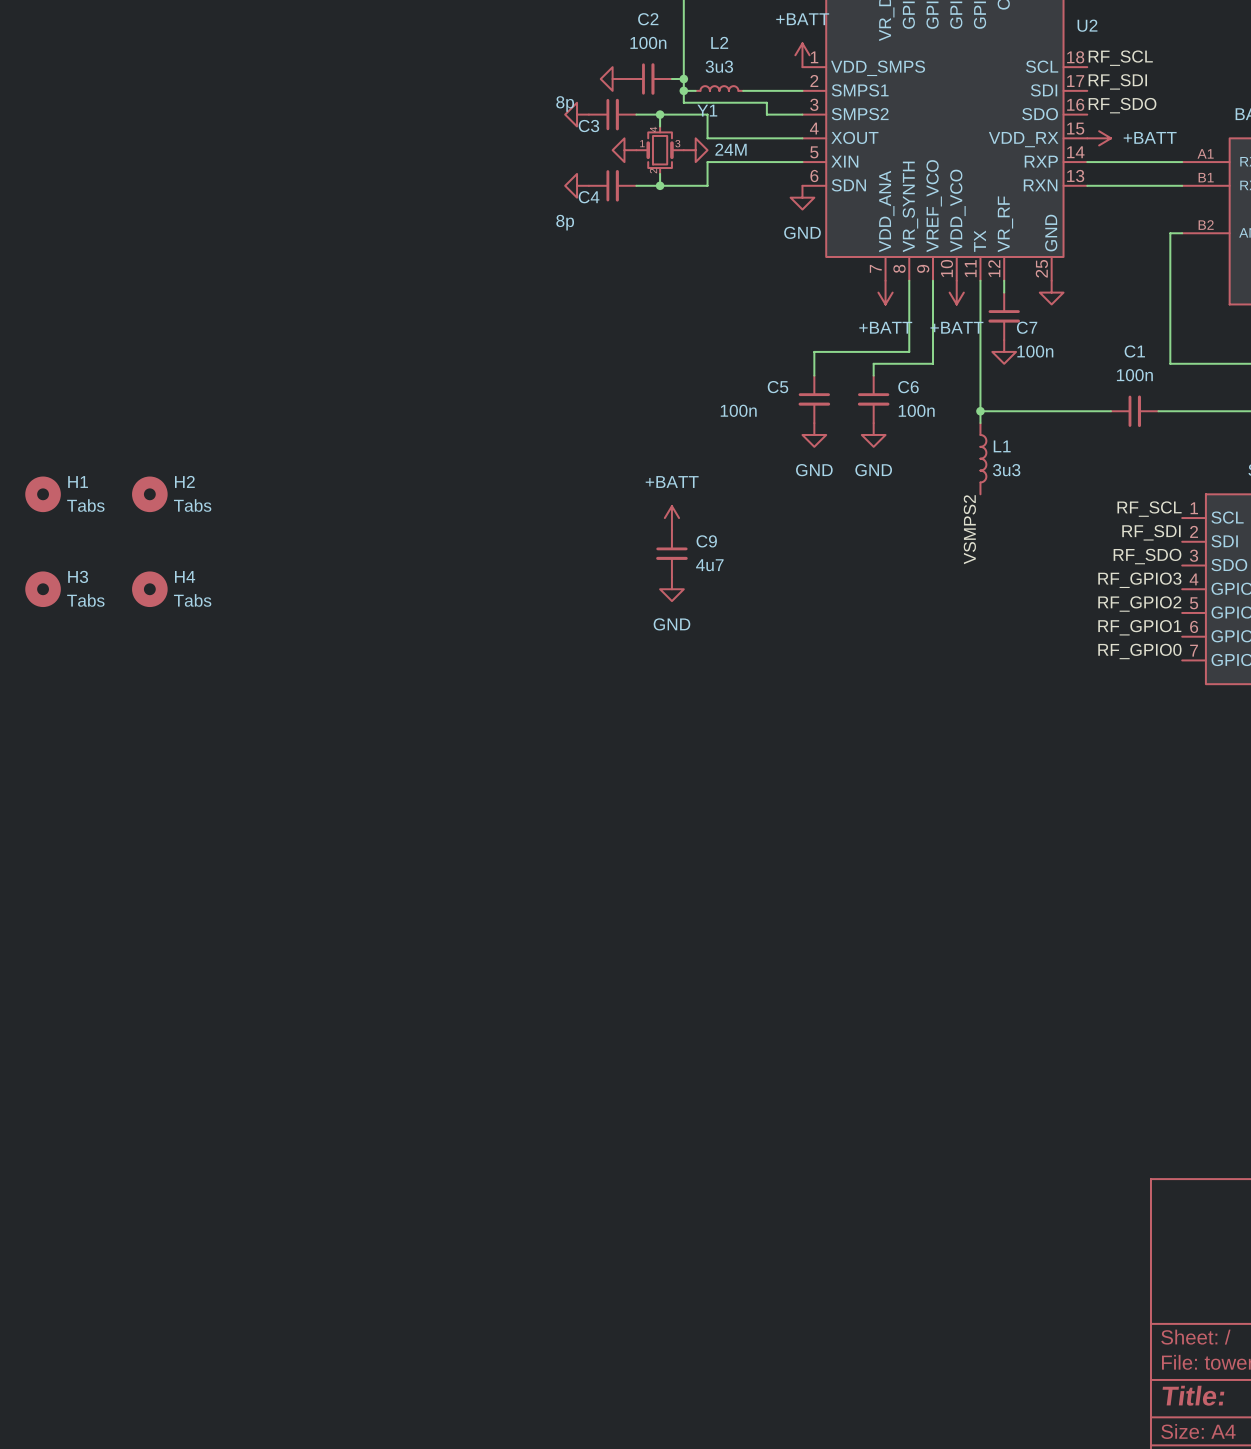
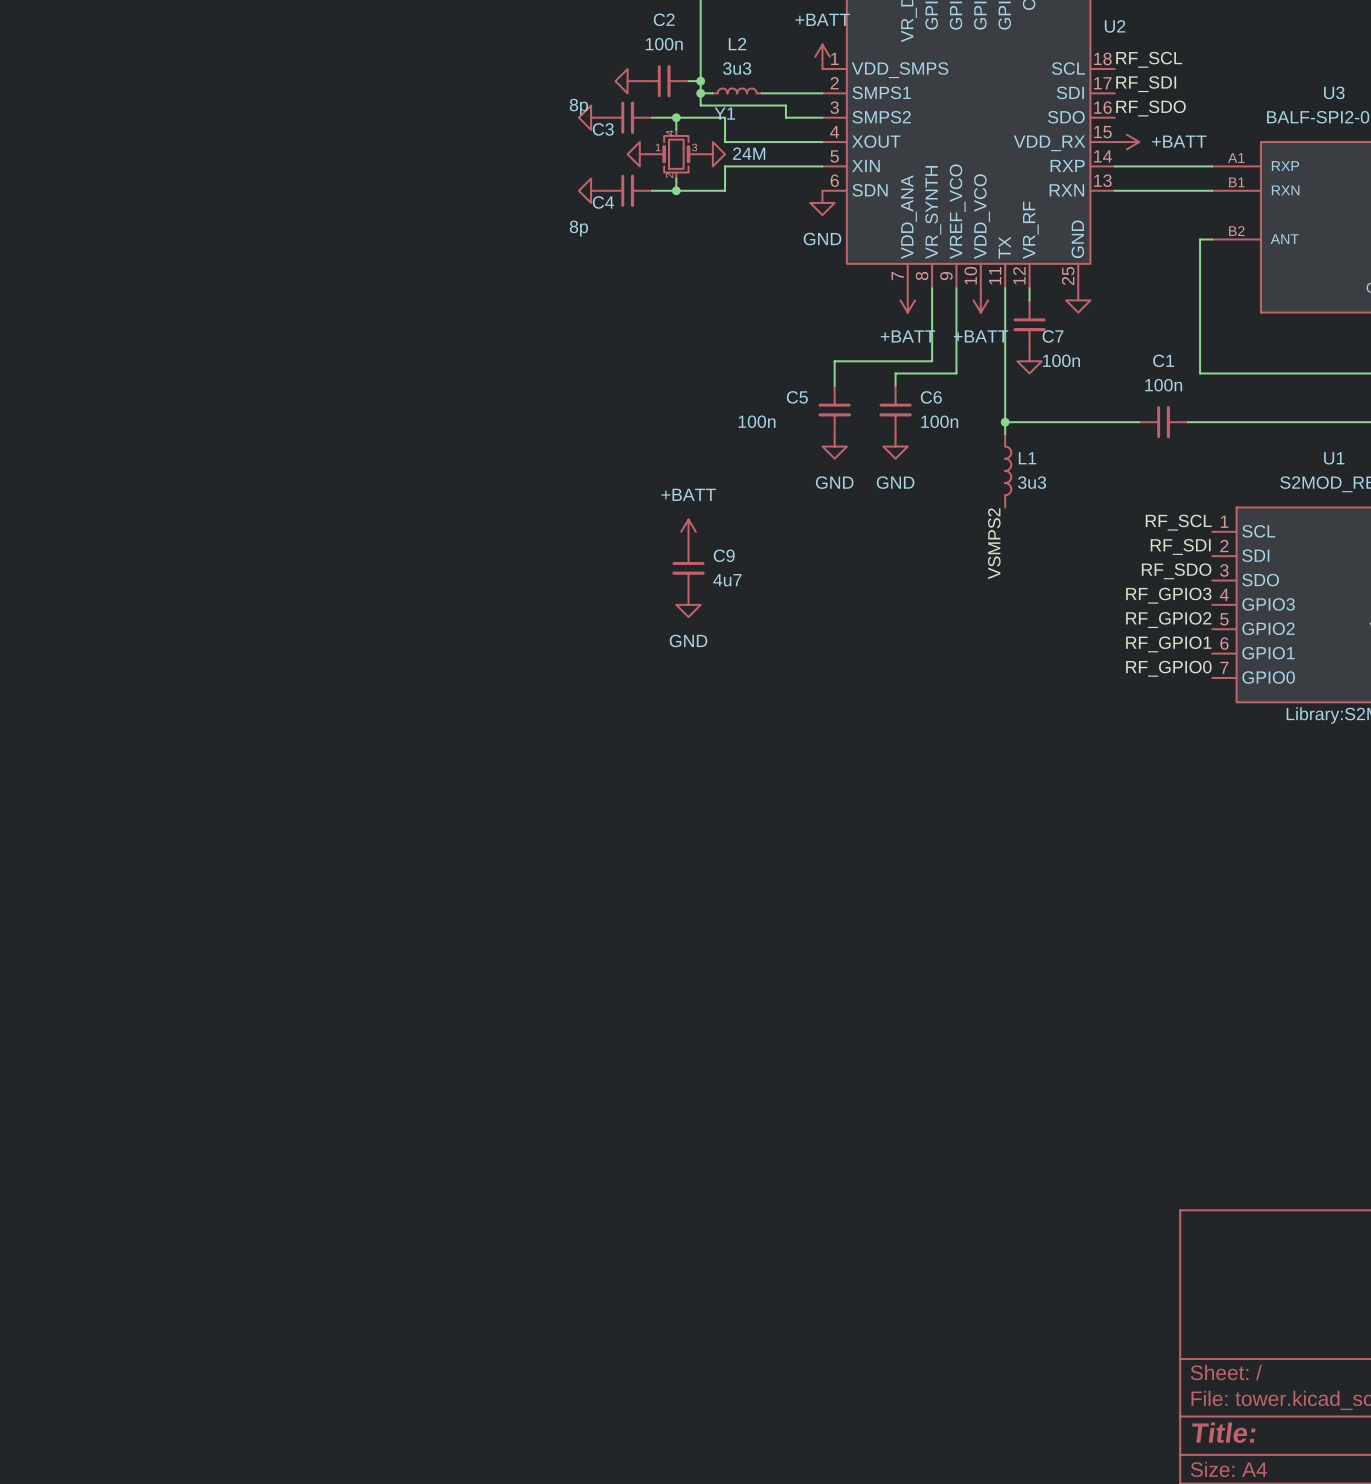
H1: Tabs (43, 494) -> none
H2: Tabs (149, 494) -> none
H3: Tabs (43, 589) -> none
H4: Tabs (149, 589) -> none

